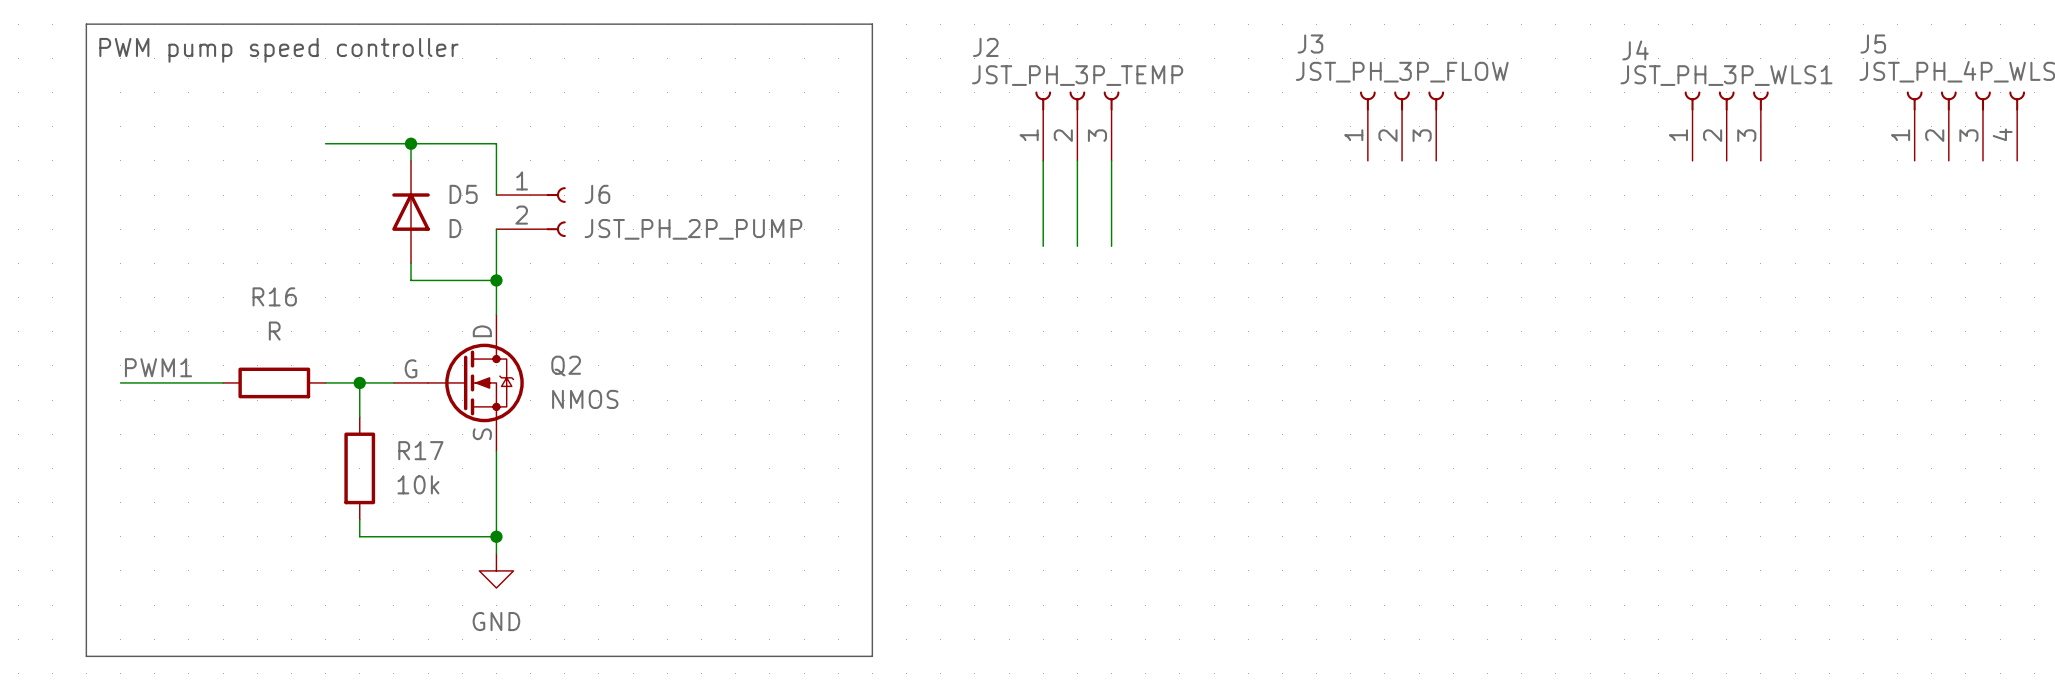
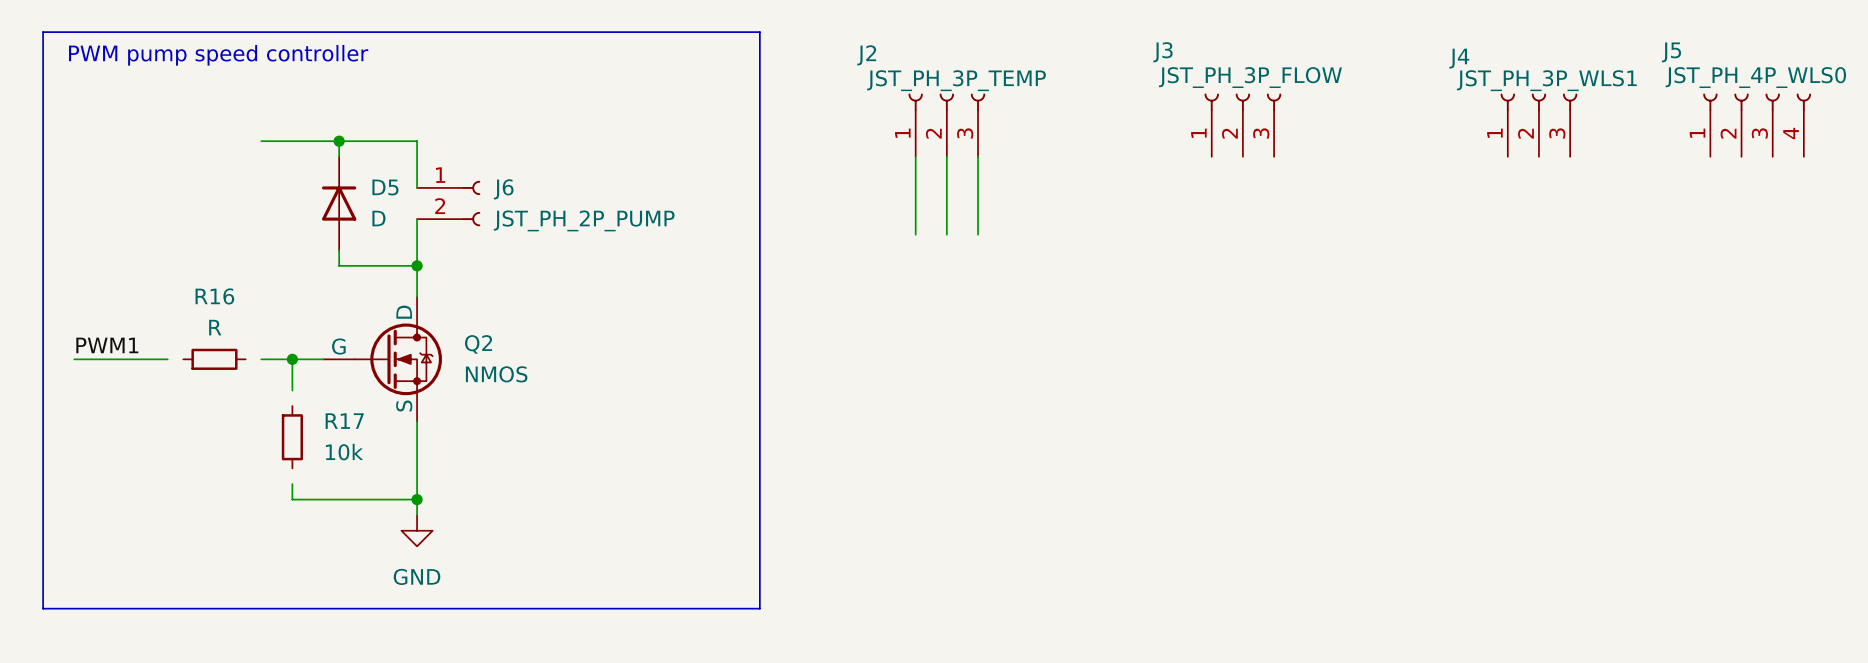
R16 symbol: [223, 367, 326, 399] -> [183, 348, 246, 370]
R17 symbol: [344, 417, 376, 520] -> [281, 406, 303, 469]

